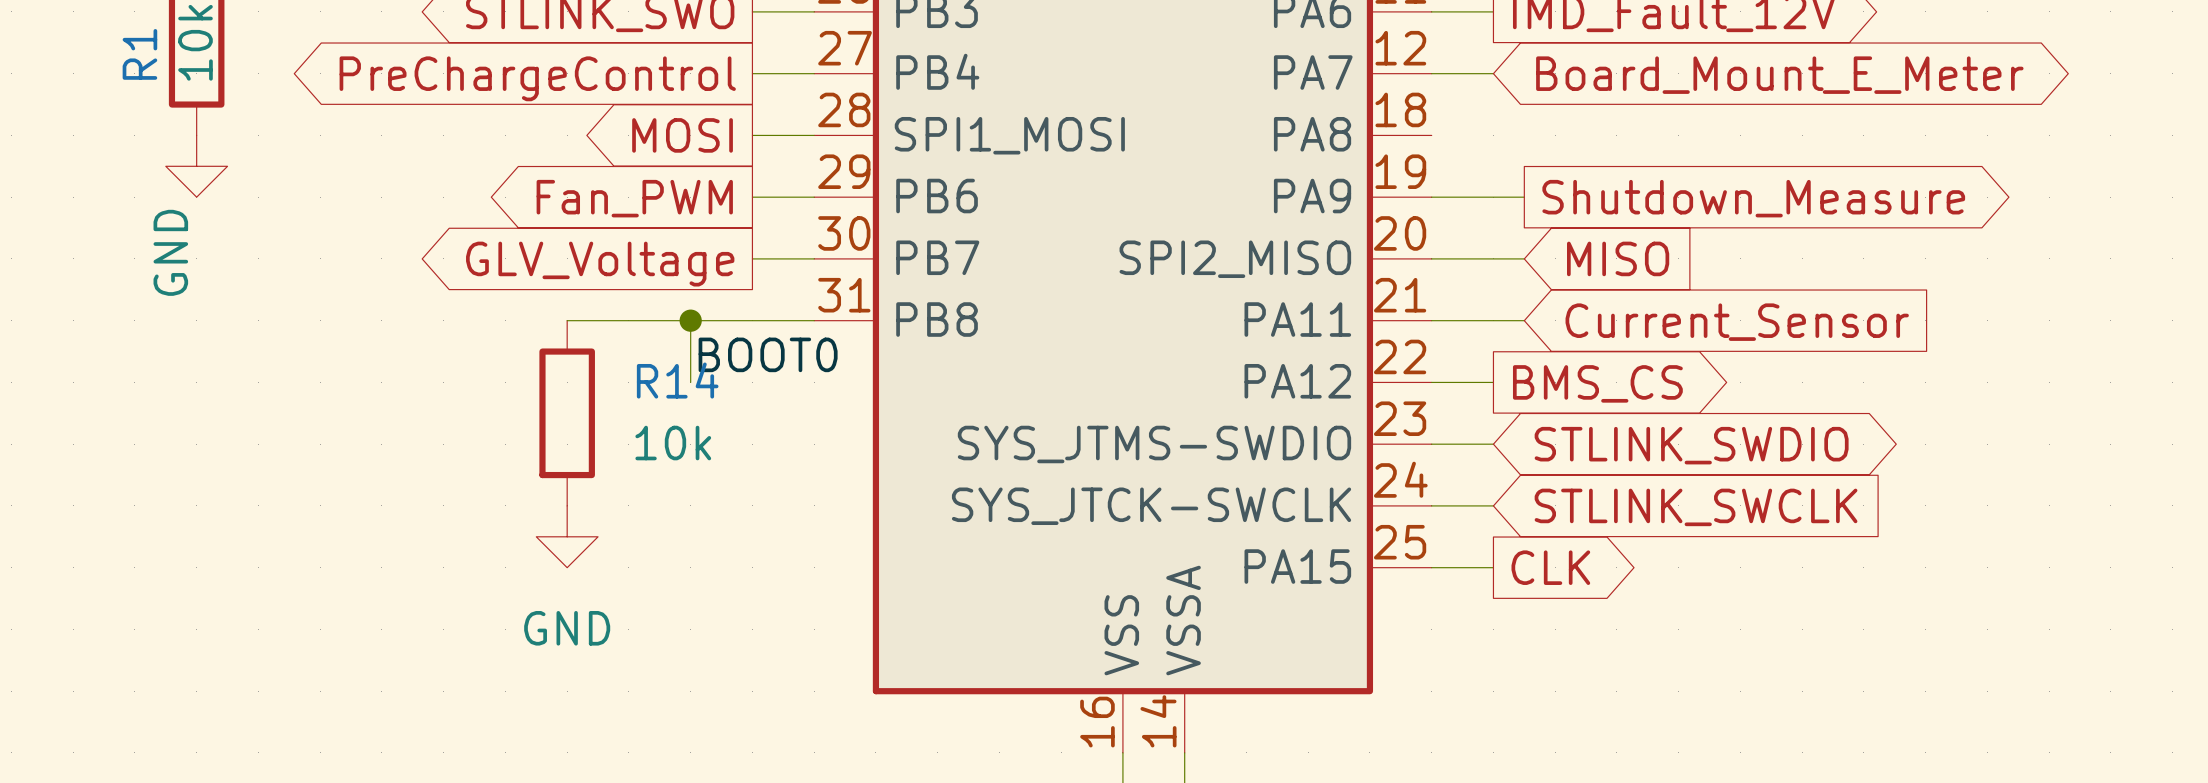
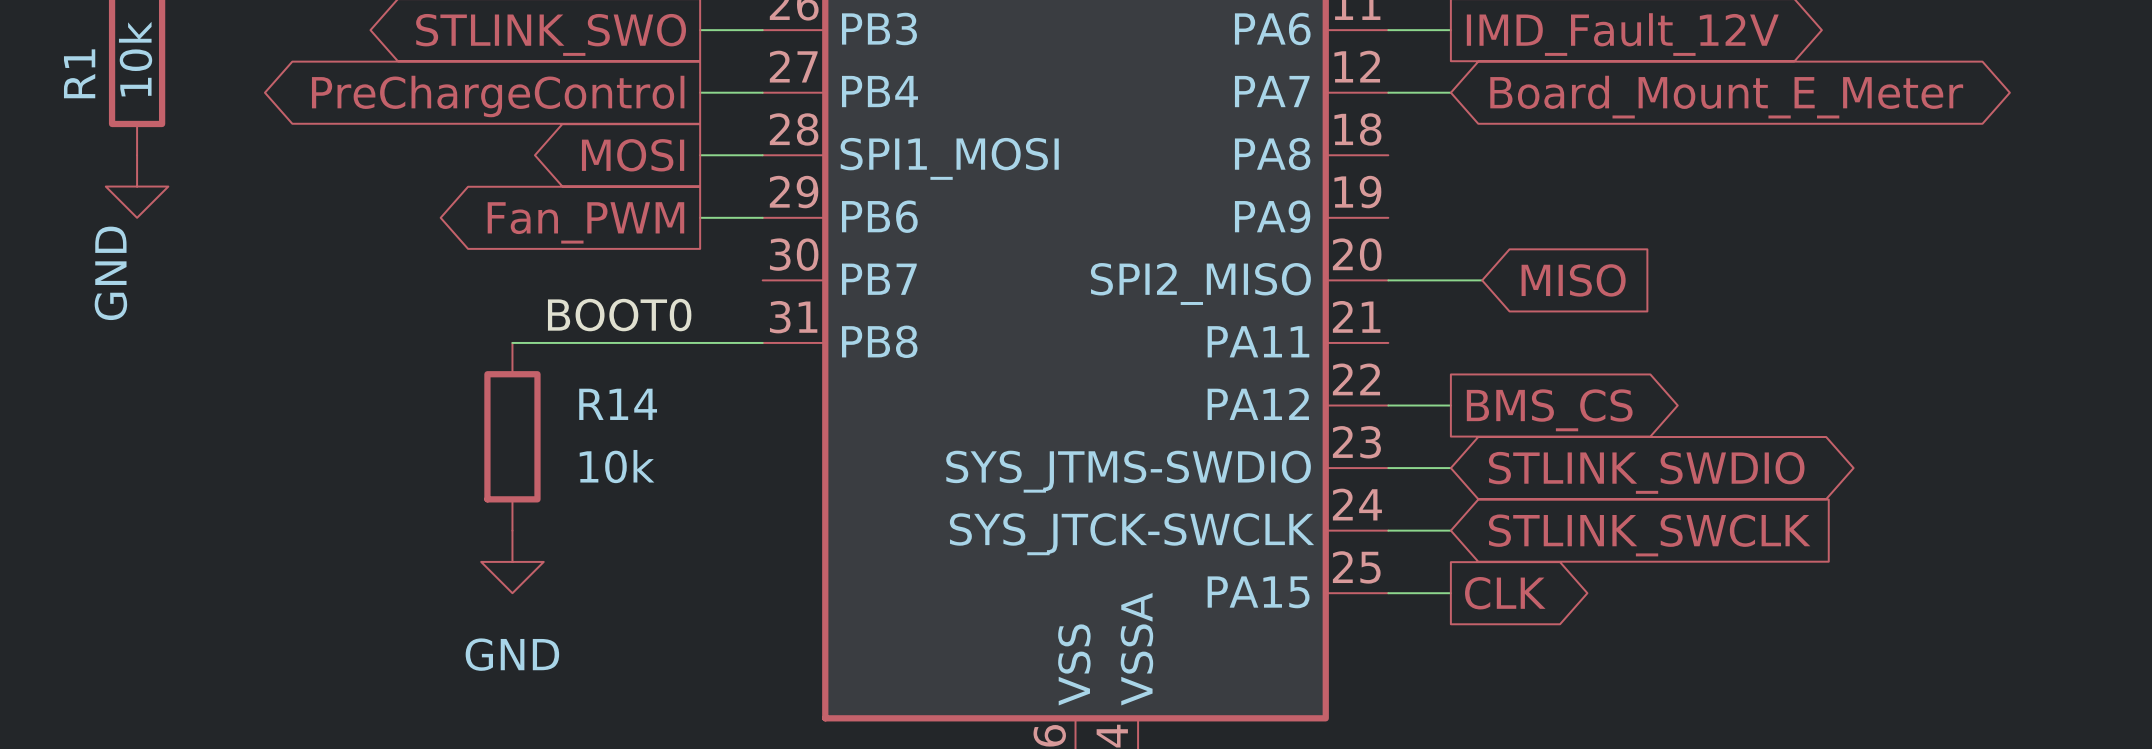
wire: (1431, 197) (1524, 197) -> none
global label: Shutdown_Measure (1753, 198) -> none
wire: (752, 258) (814, 258) -> none
global label: GLV_Voltage (600, 264) -> none
wire: (690, 320) (690, 382) -> none
junction: (690, 320) -> none
wire: (1431, 320) (1524, 320) -> none
global label: Current_Sensor (1737, 322) -> none
label position: BOOT0 (768, 354) -> BOOT0 (619, 315)

